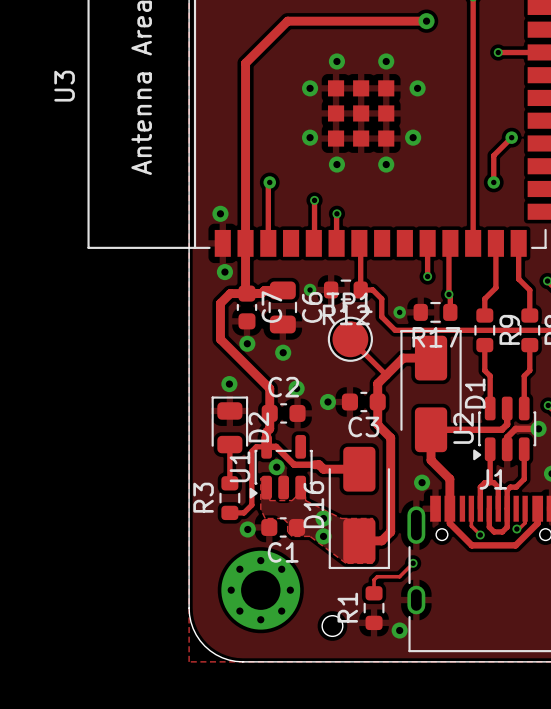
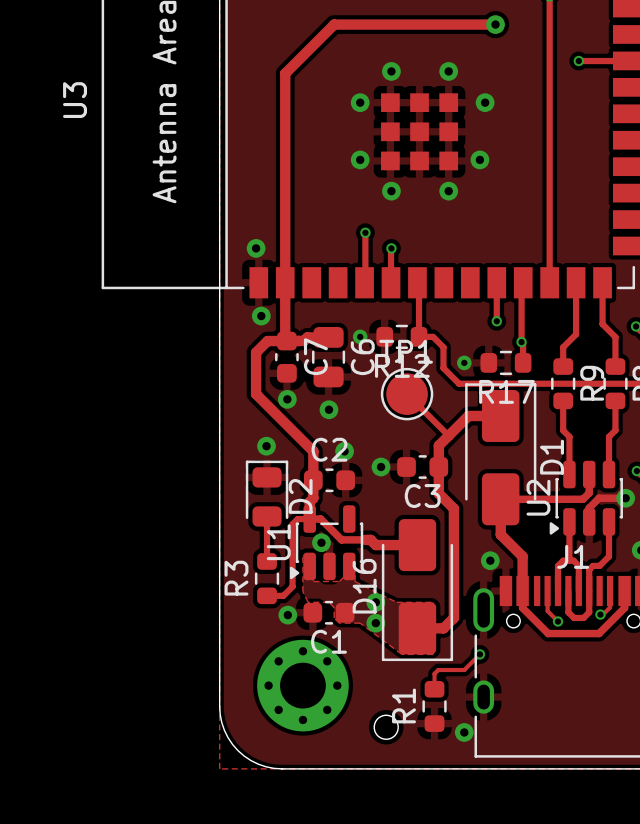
track: (511, 137) (493, 155) (493, 182) -> none
via: (511, 137) -> none
track: (269, 182) (268, 243) -> none
via: (269, 182) -> none
via: (493, 182) -> none

